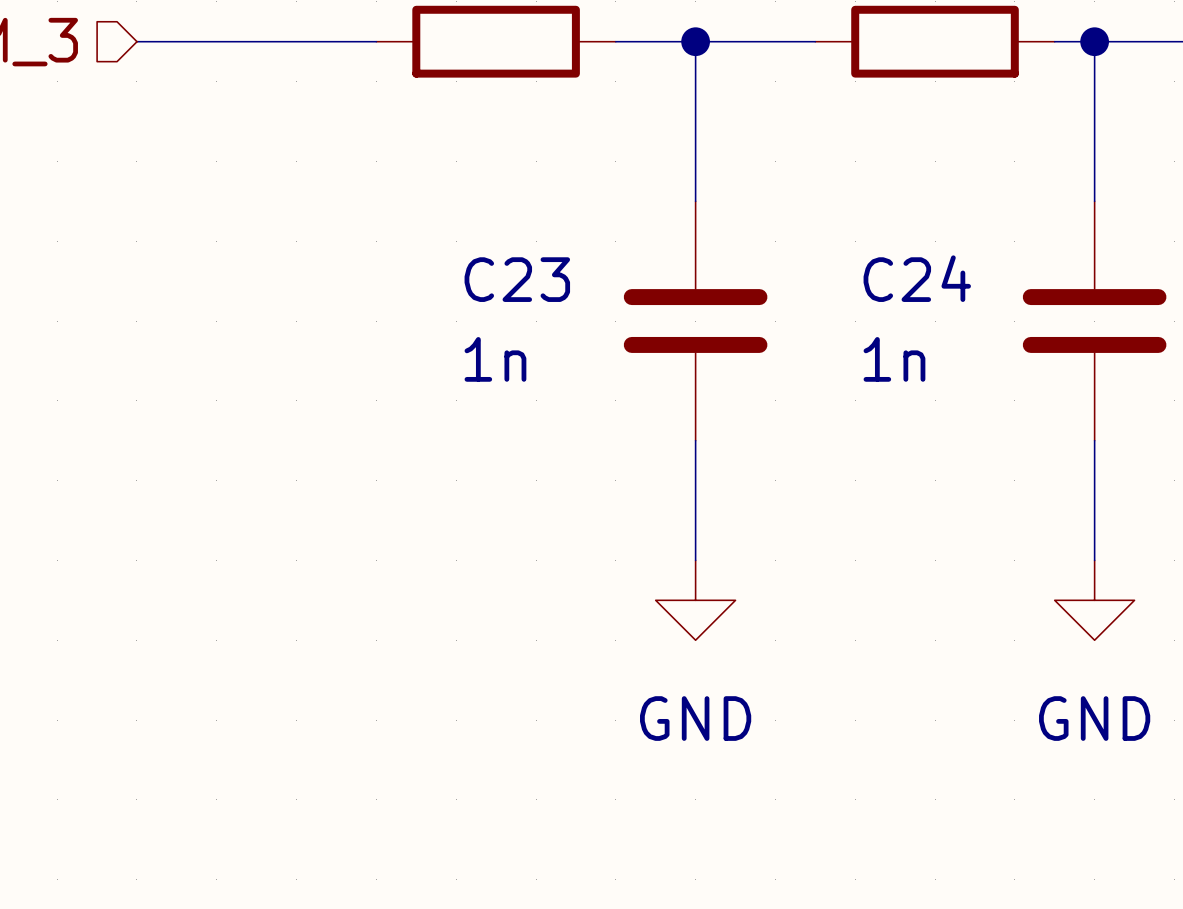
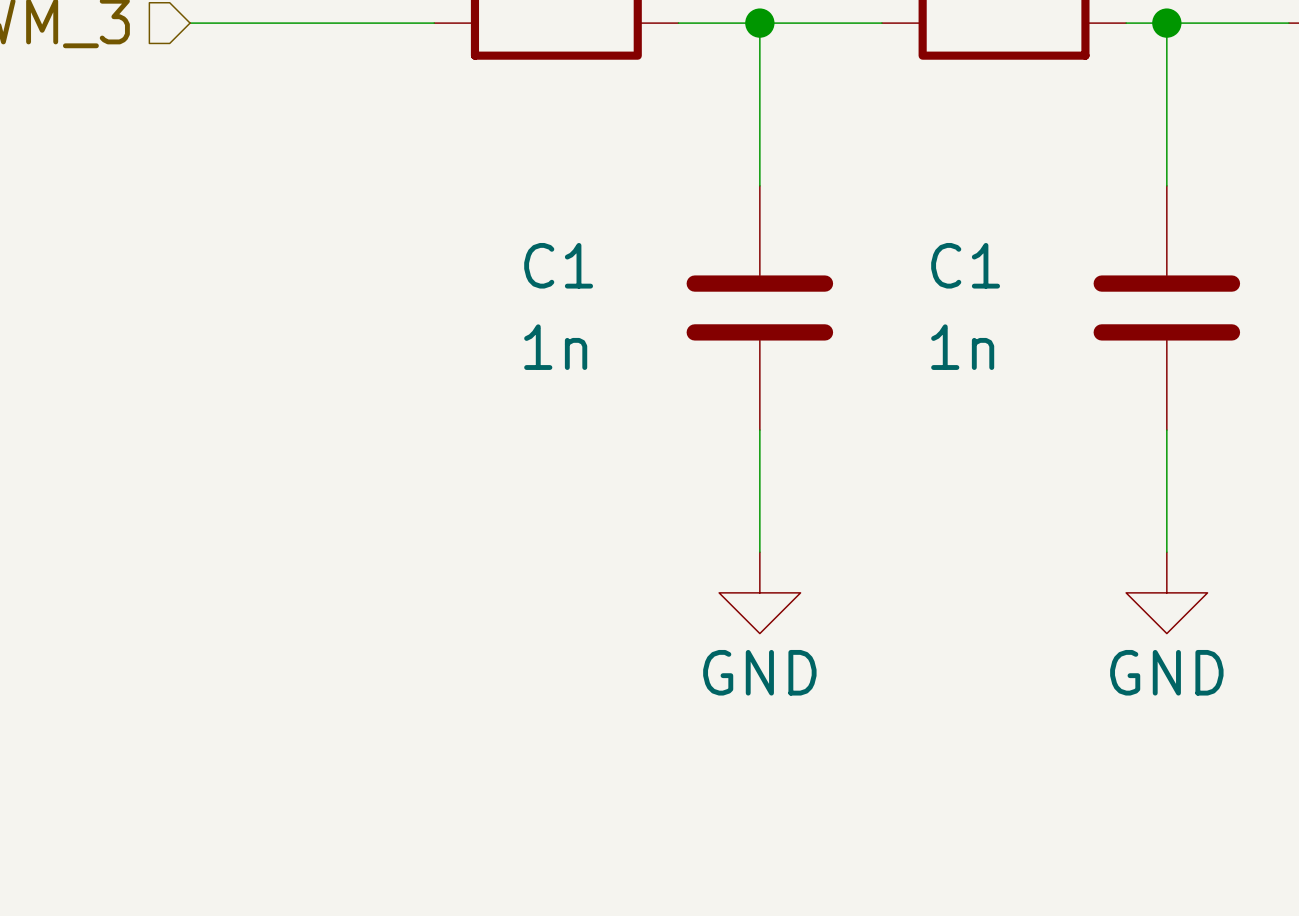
C24 name: C24 (917, 278) -> C1 (965, 265)
C23 name: C23 (517, 279) -> C1 (558, 265)
power symbol text position: GND (695, 718) -> GND (759, 672)
power symbol text position: GND (1094, 718) -> GND (1166, 672)

